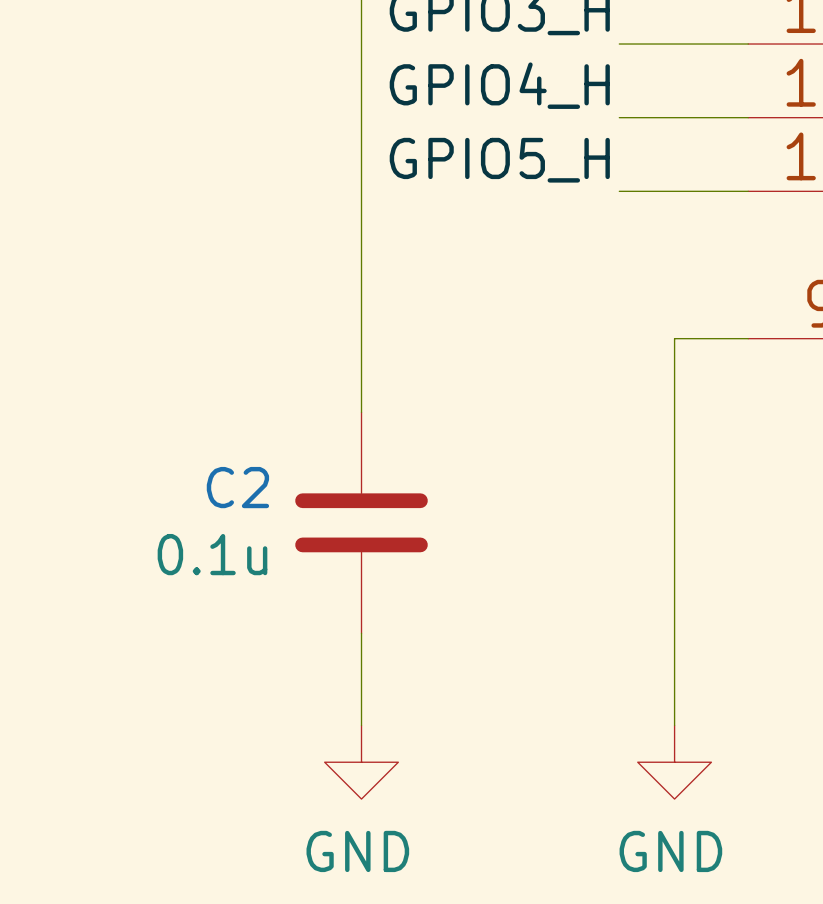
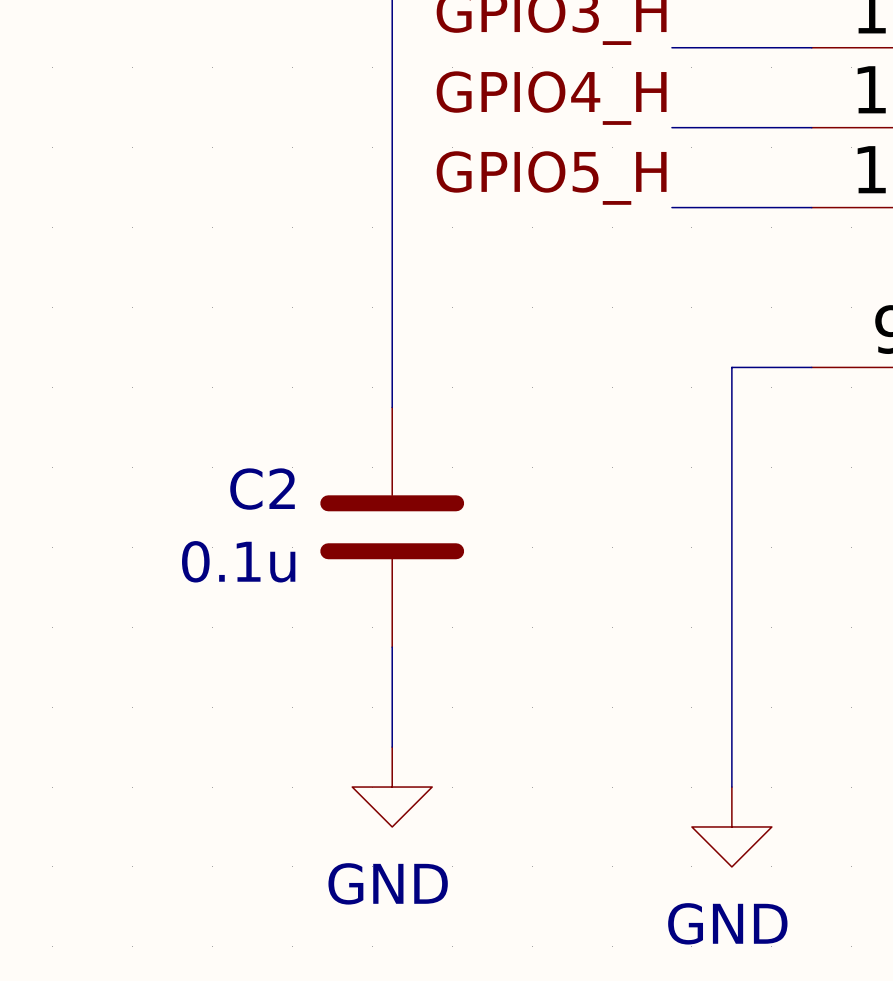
C2 position: (361, 522) -> (392, 527)
power symbol position: GND (361, 762) -> GND (392, 787)

